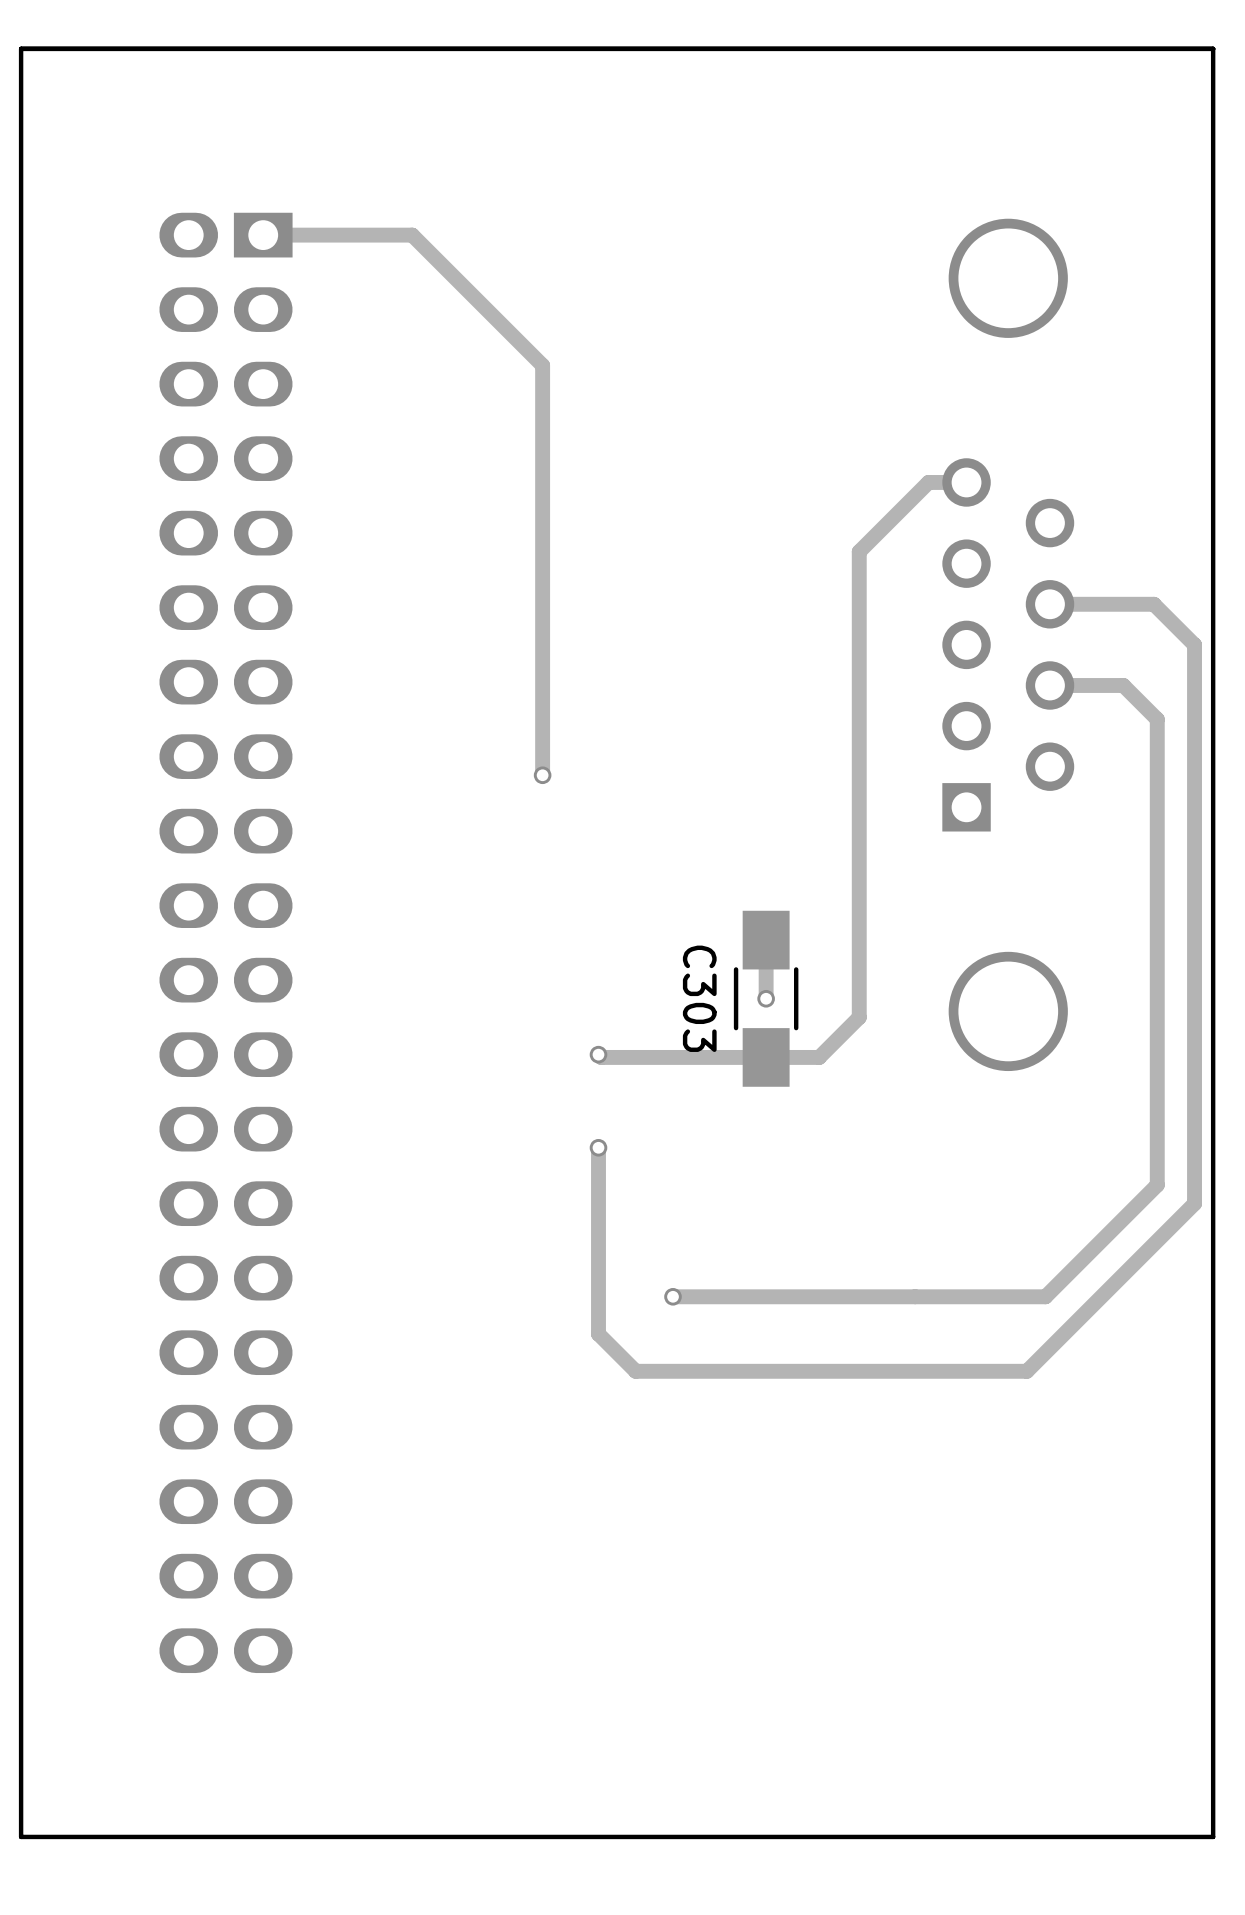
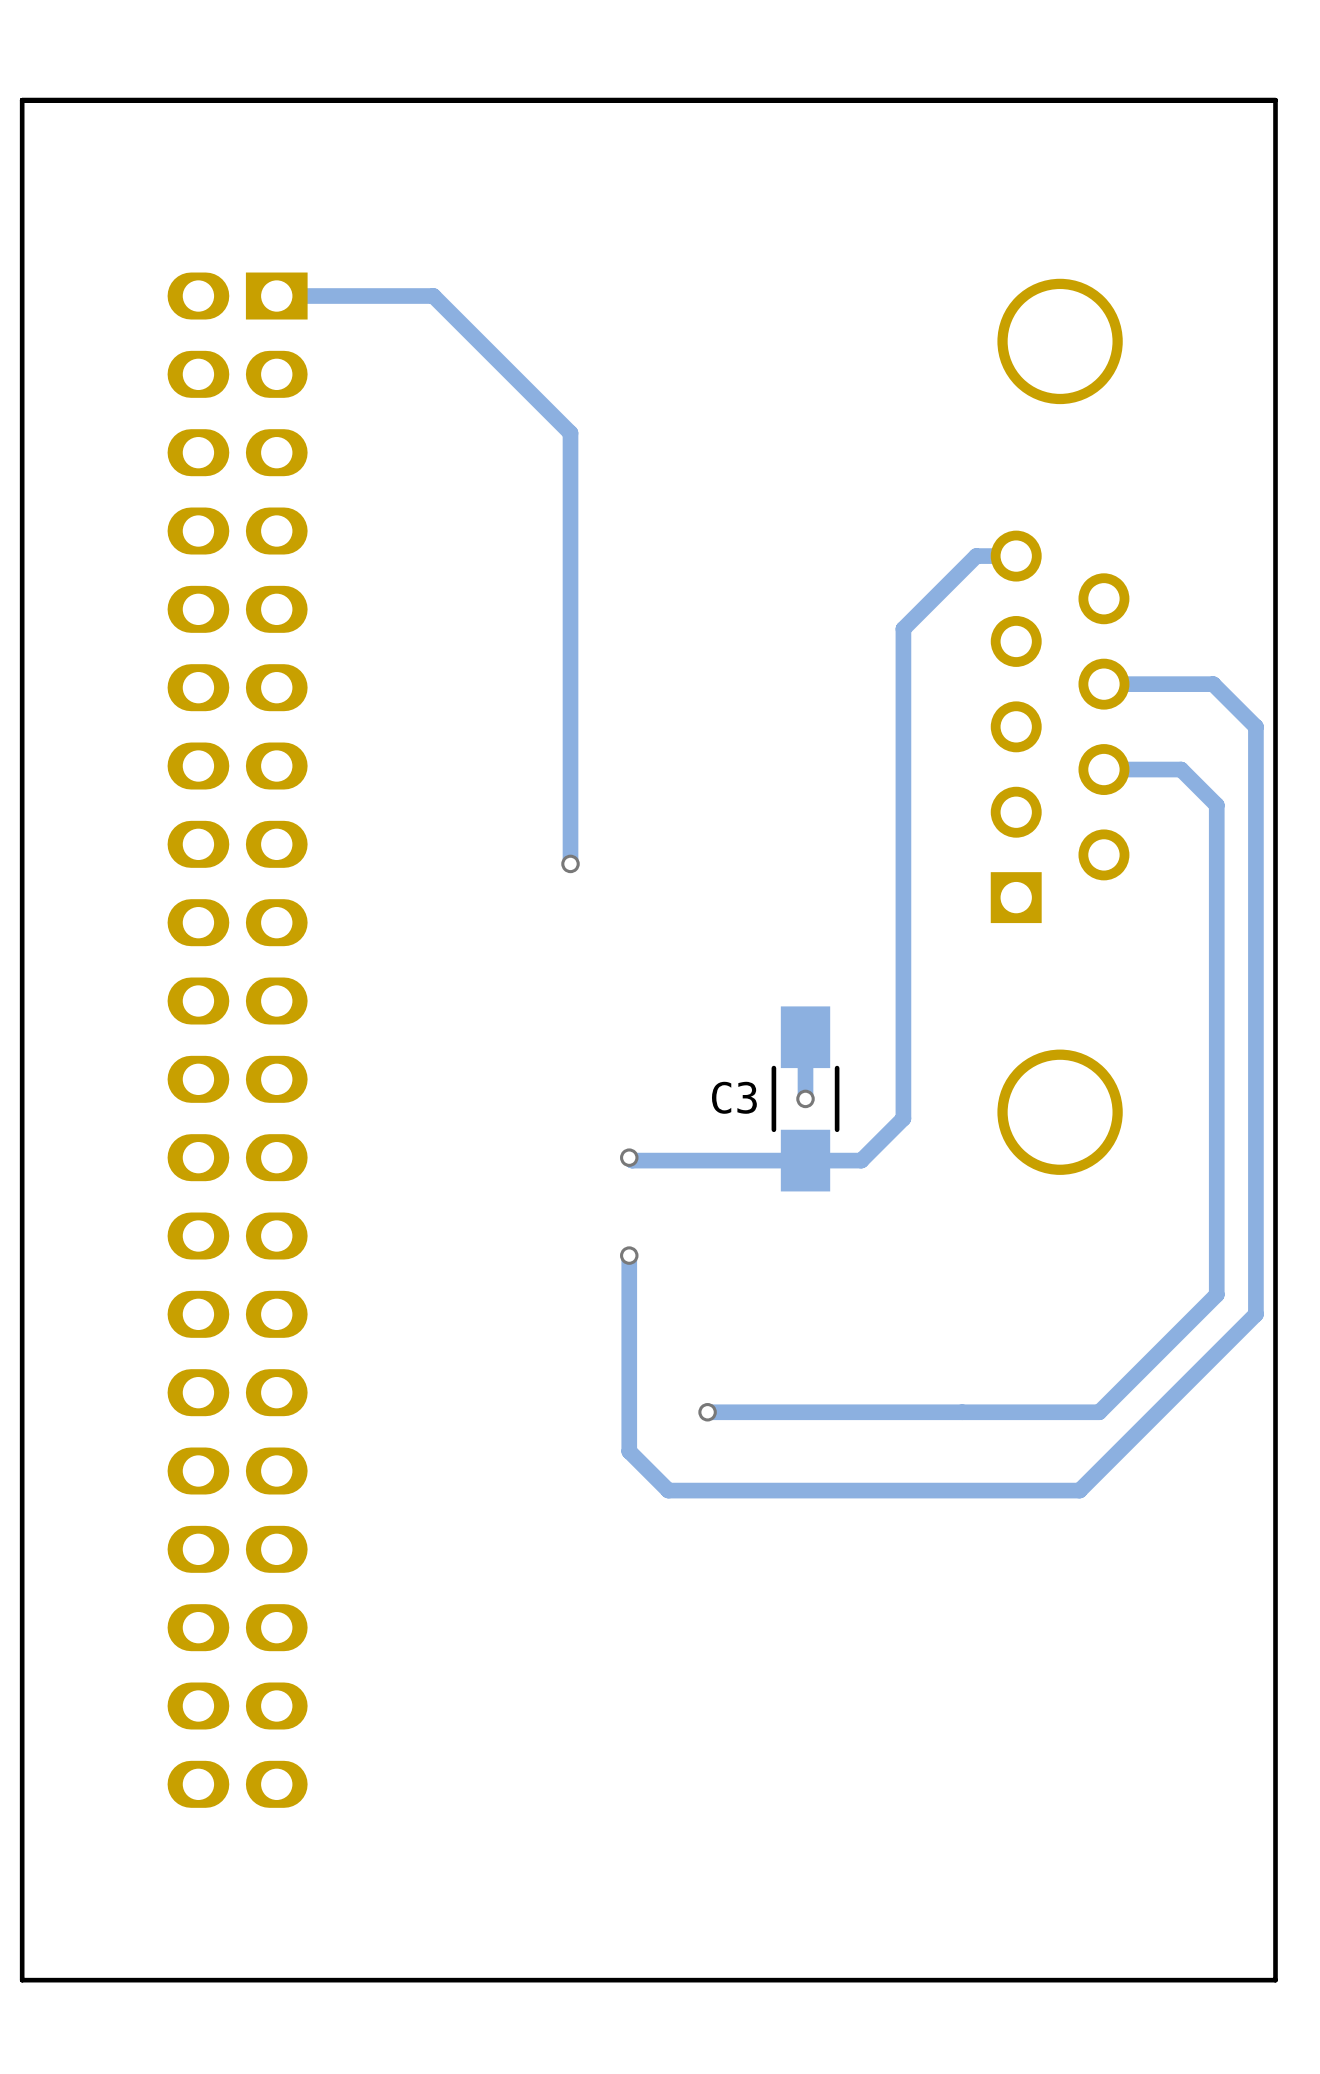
C303 name: C303 (699, 998) -> C3 (734, 1097)

